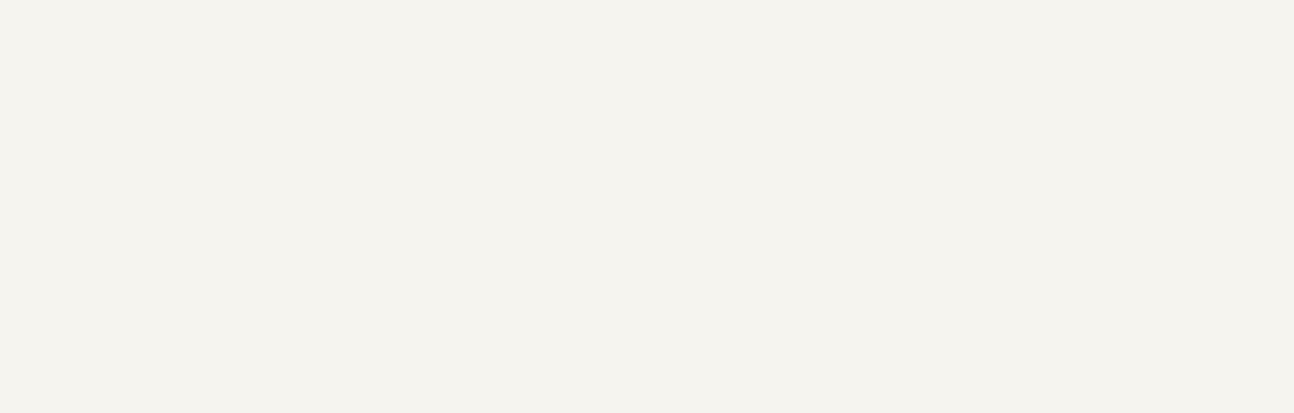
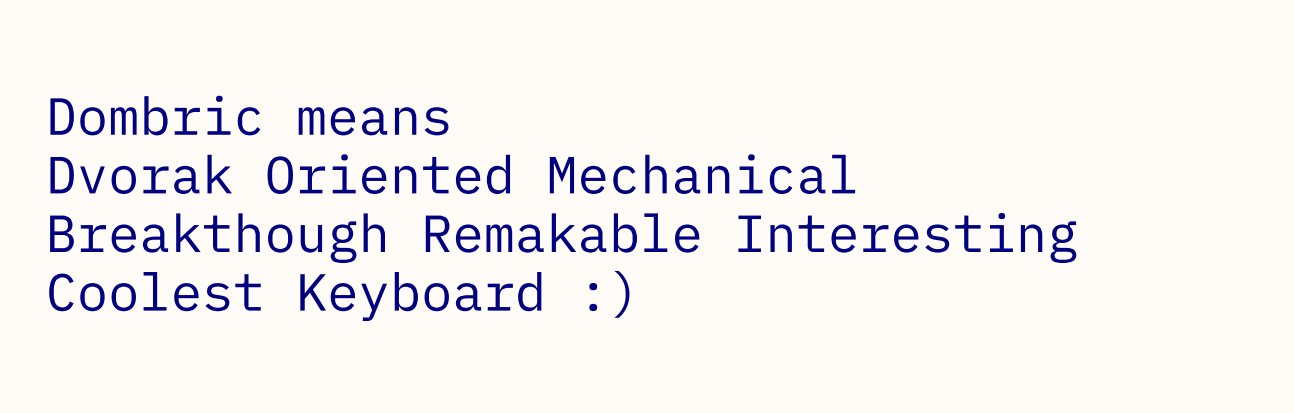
text: none -> Dombric means (249, 115)
text: none -> Dvorak Oriented Mechanical (452, 174)
text: none -> Breakthough Remakable Interesting (563, 238)
text: none -> Coolest Keyboard :) (339, 296)

